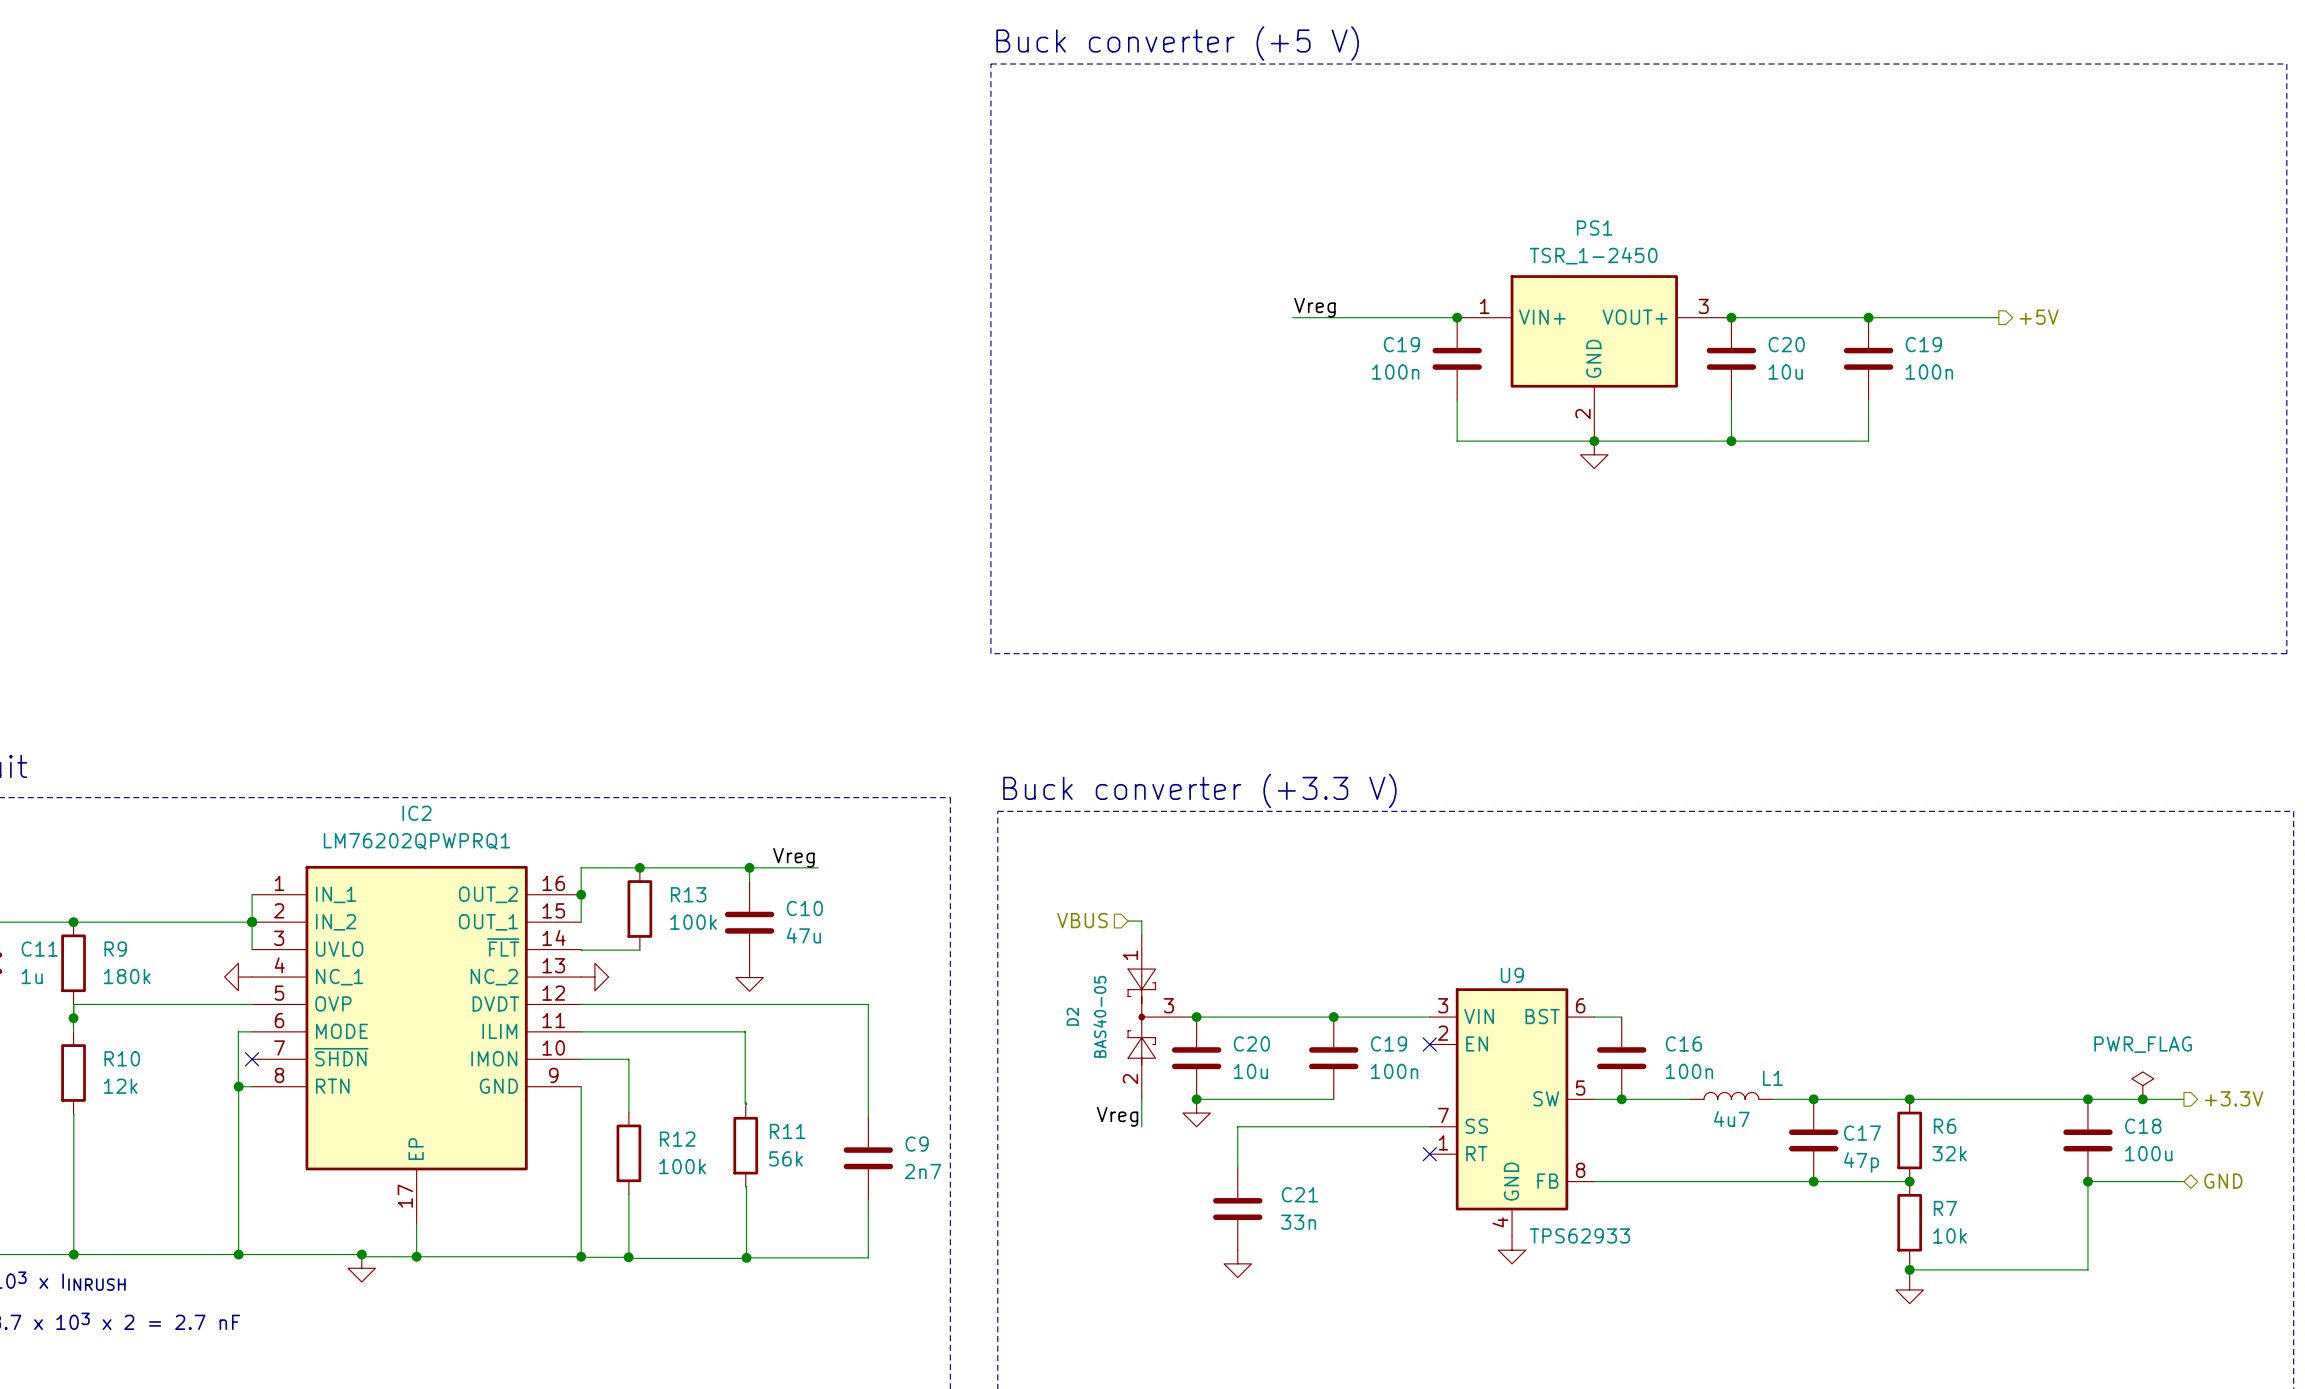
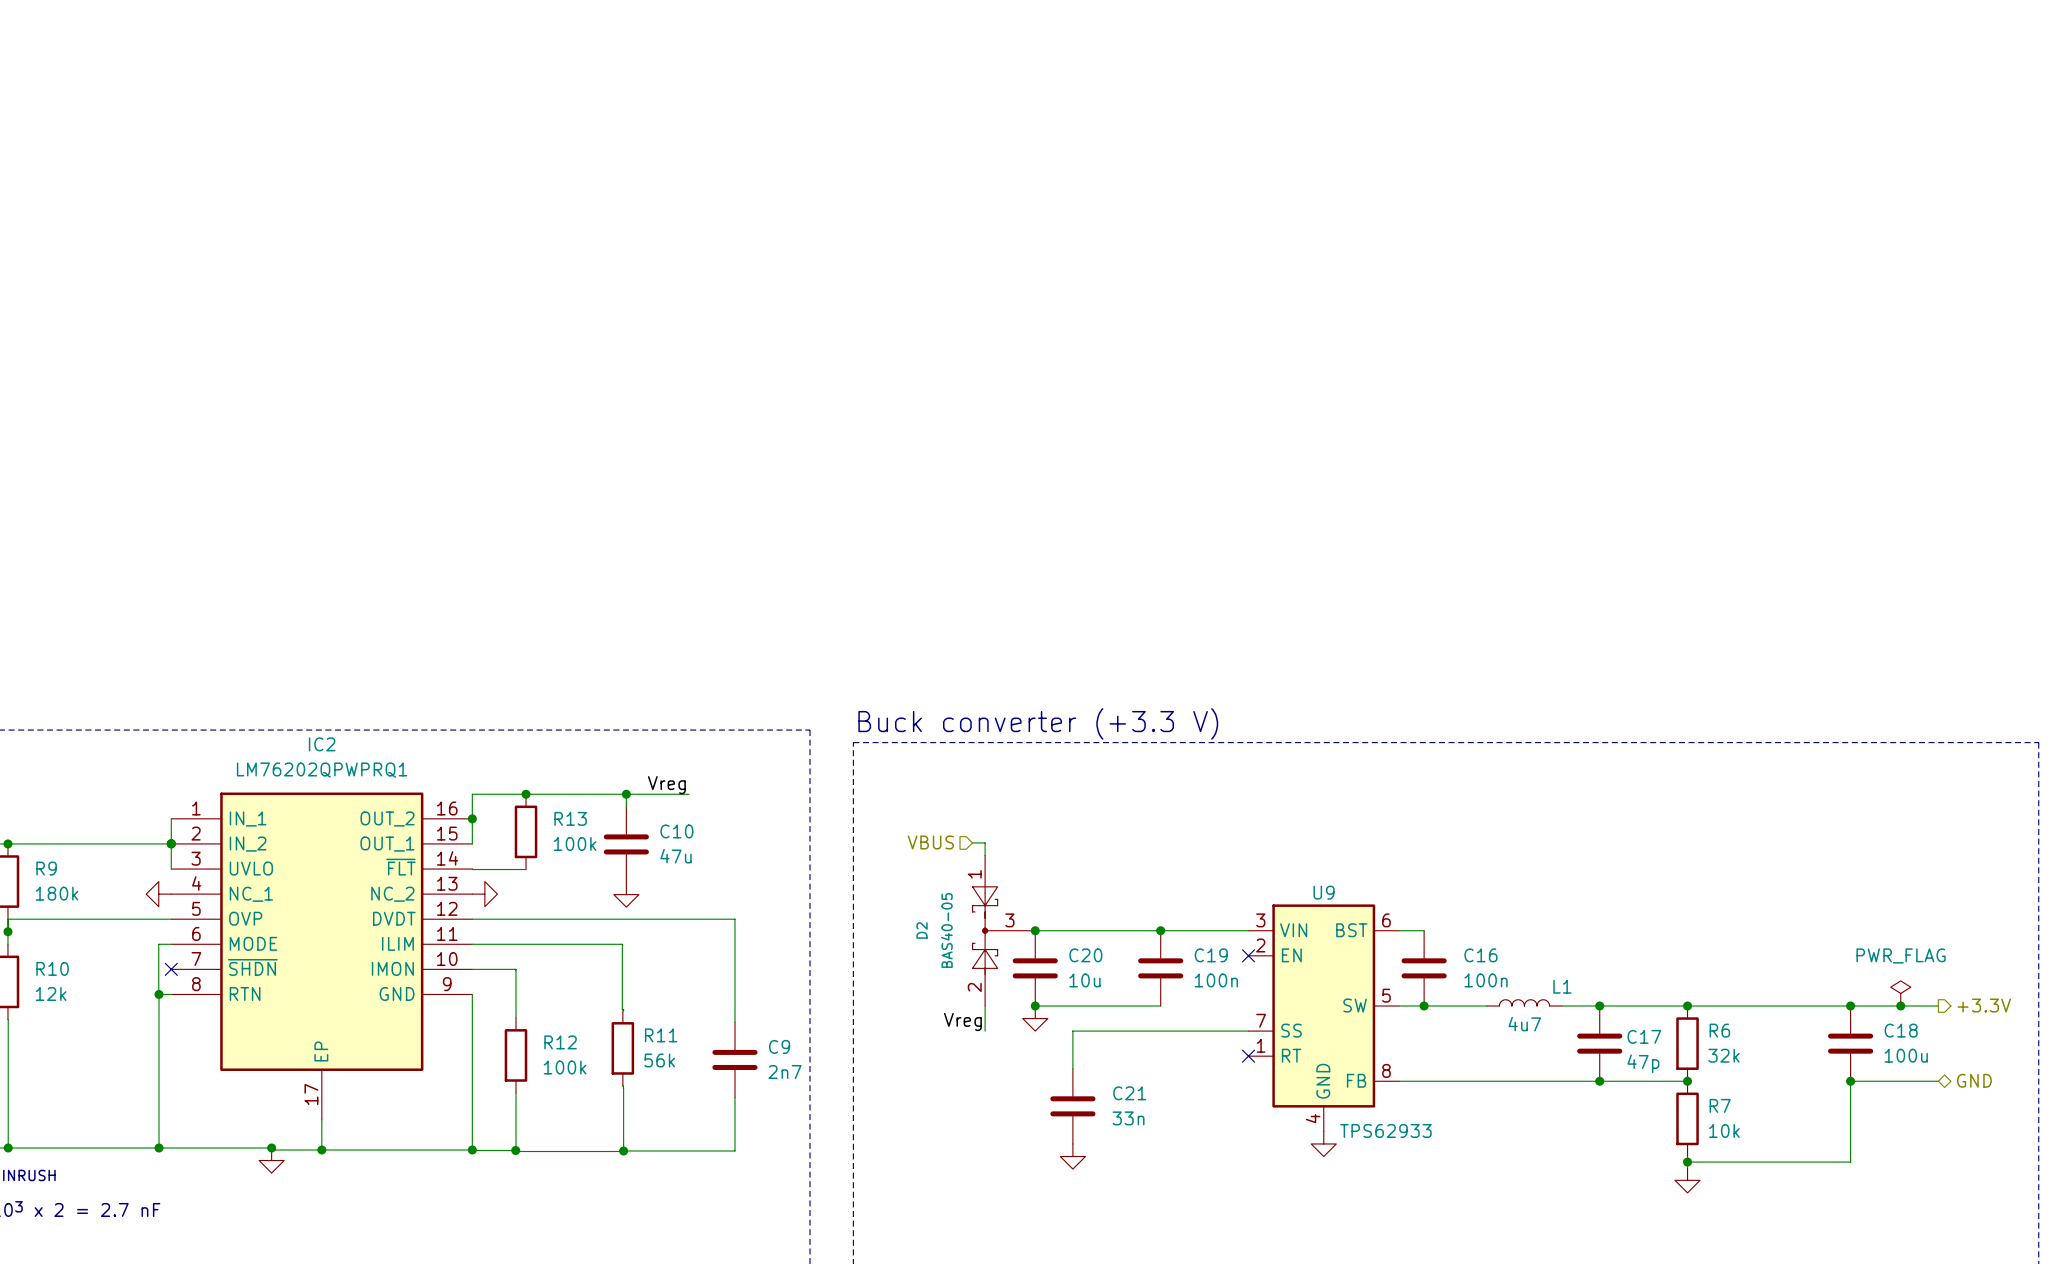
text: Buck converter (+5 V) (1177, 43) -> none
line: (990, 64) (2286, 64) (2286, 653) (990, 653) (990, 64) -> none
label: Vreg (1314, 307) -> none
wire: (1292, 317) (1457, 317) -> none
junction: (1457, 317) -> none
wire: (1731, 317) (1998, 317) -> none
junction: (1731, 317) -> none
junction: (1868, 317) -> none
hierarchical label: +5V (2039, 317) -> none
C19: 100n (1457, 358) -> none
PS1: TSR_1-2450 (1594, 358) -> none
C20: 10u (1731, 358) -> none
C19: 100n (1868, 358) -> none
wire: (1457, 399) (1457, 441) (1868, 441) (1868, 399) -> none
wire: (1731, 399) (1731, 441) -> none
junction: (1594, 441) -> none
junction: (1731, 441) -> none
power symbol: (1594, 454) -> none

